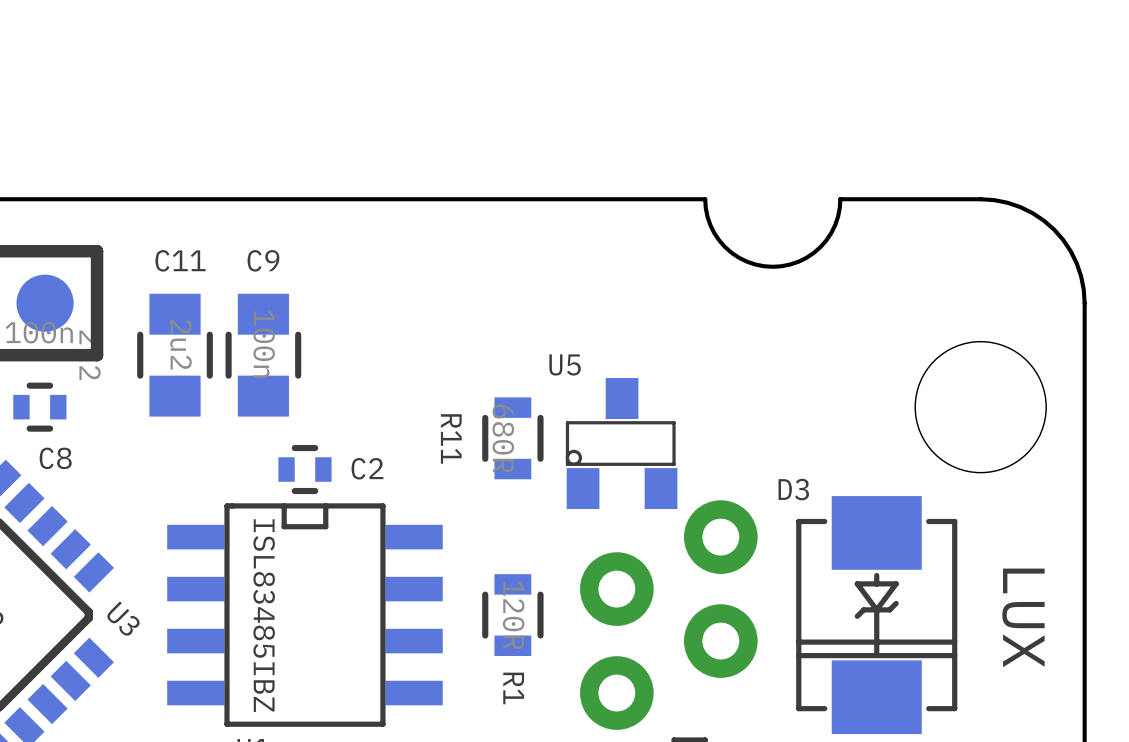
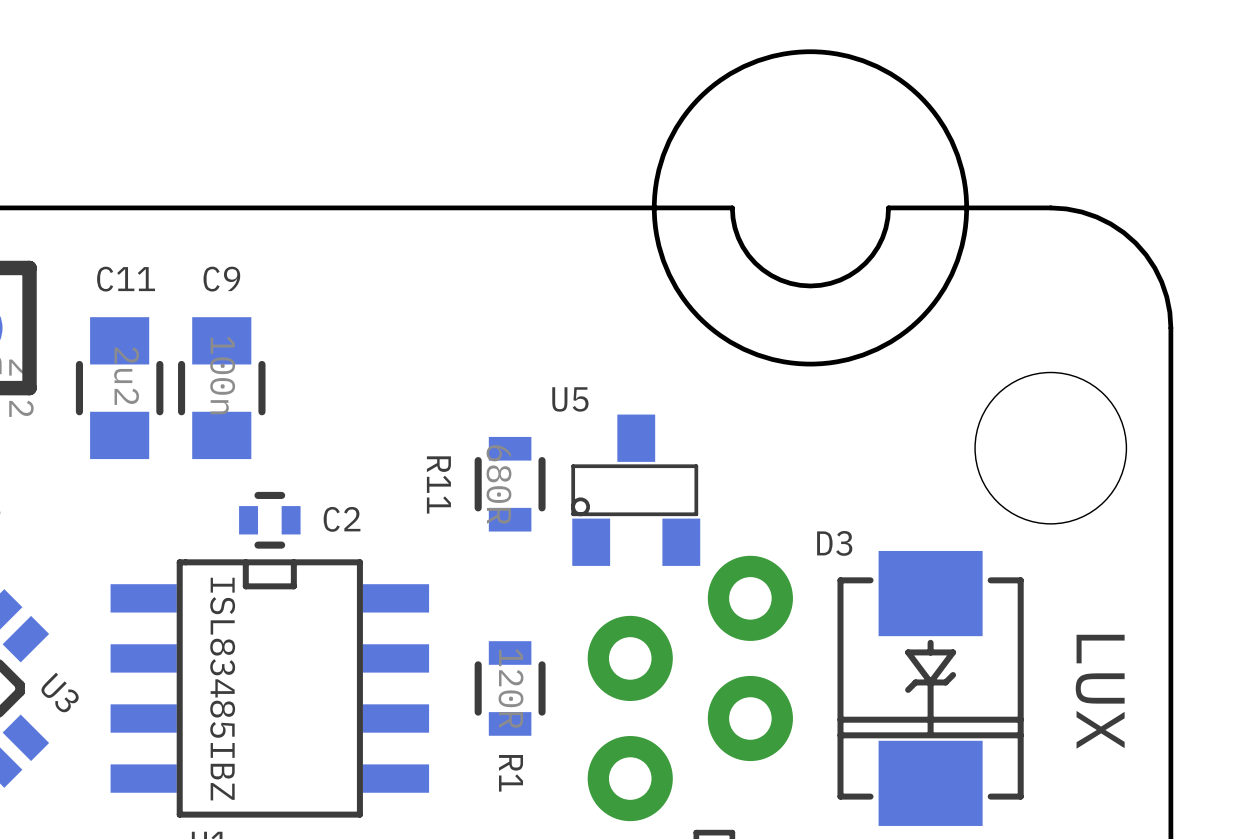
round board edge: none -> [651, 49, 970, 367]

